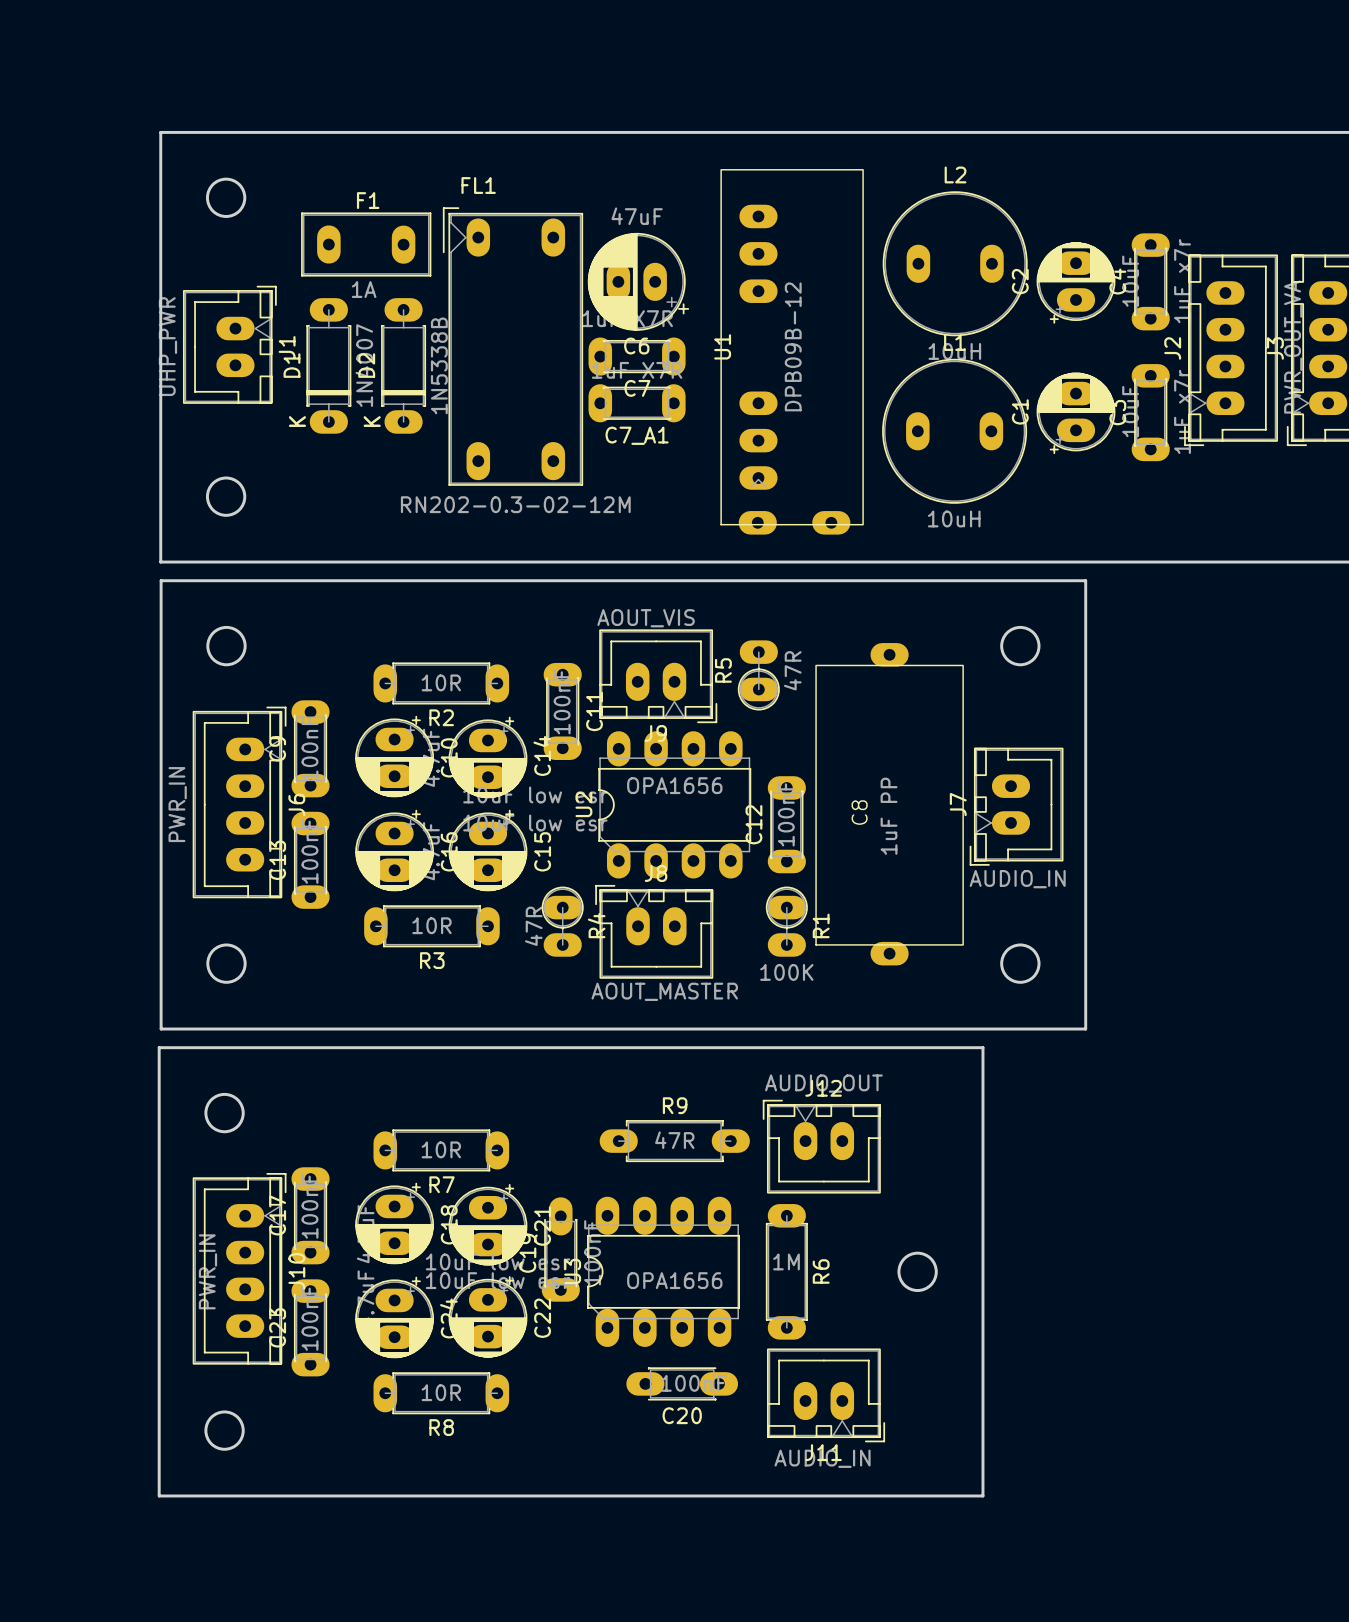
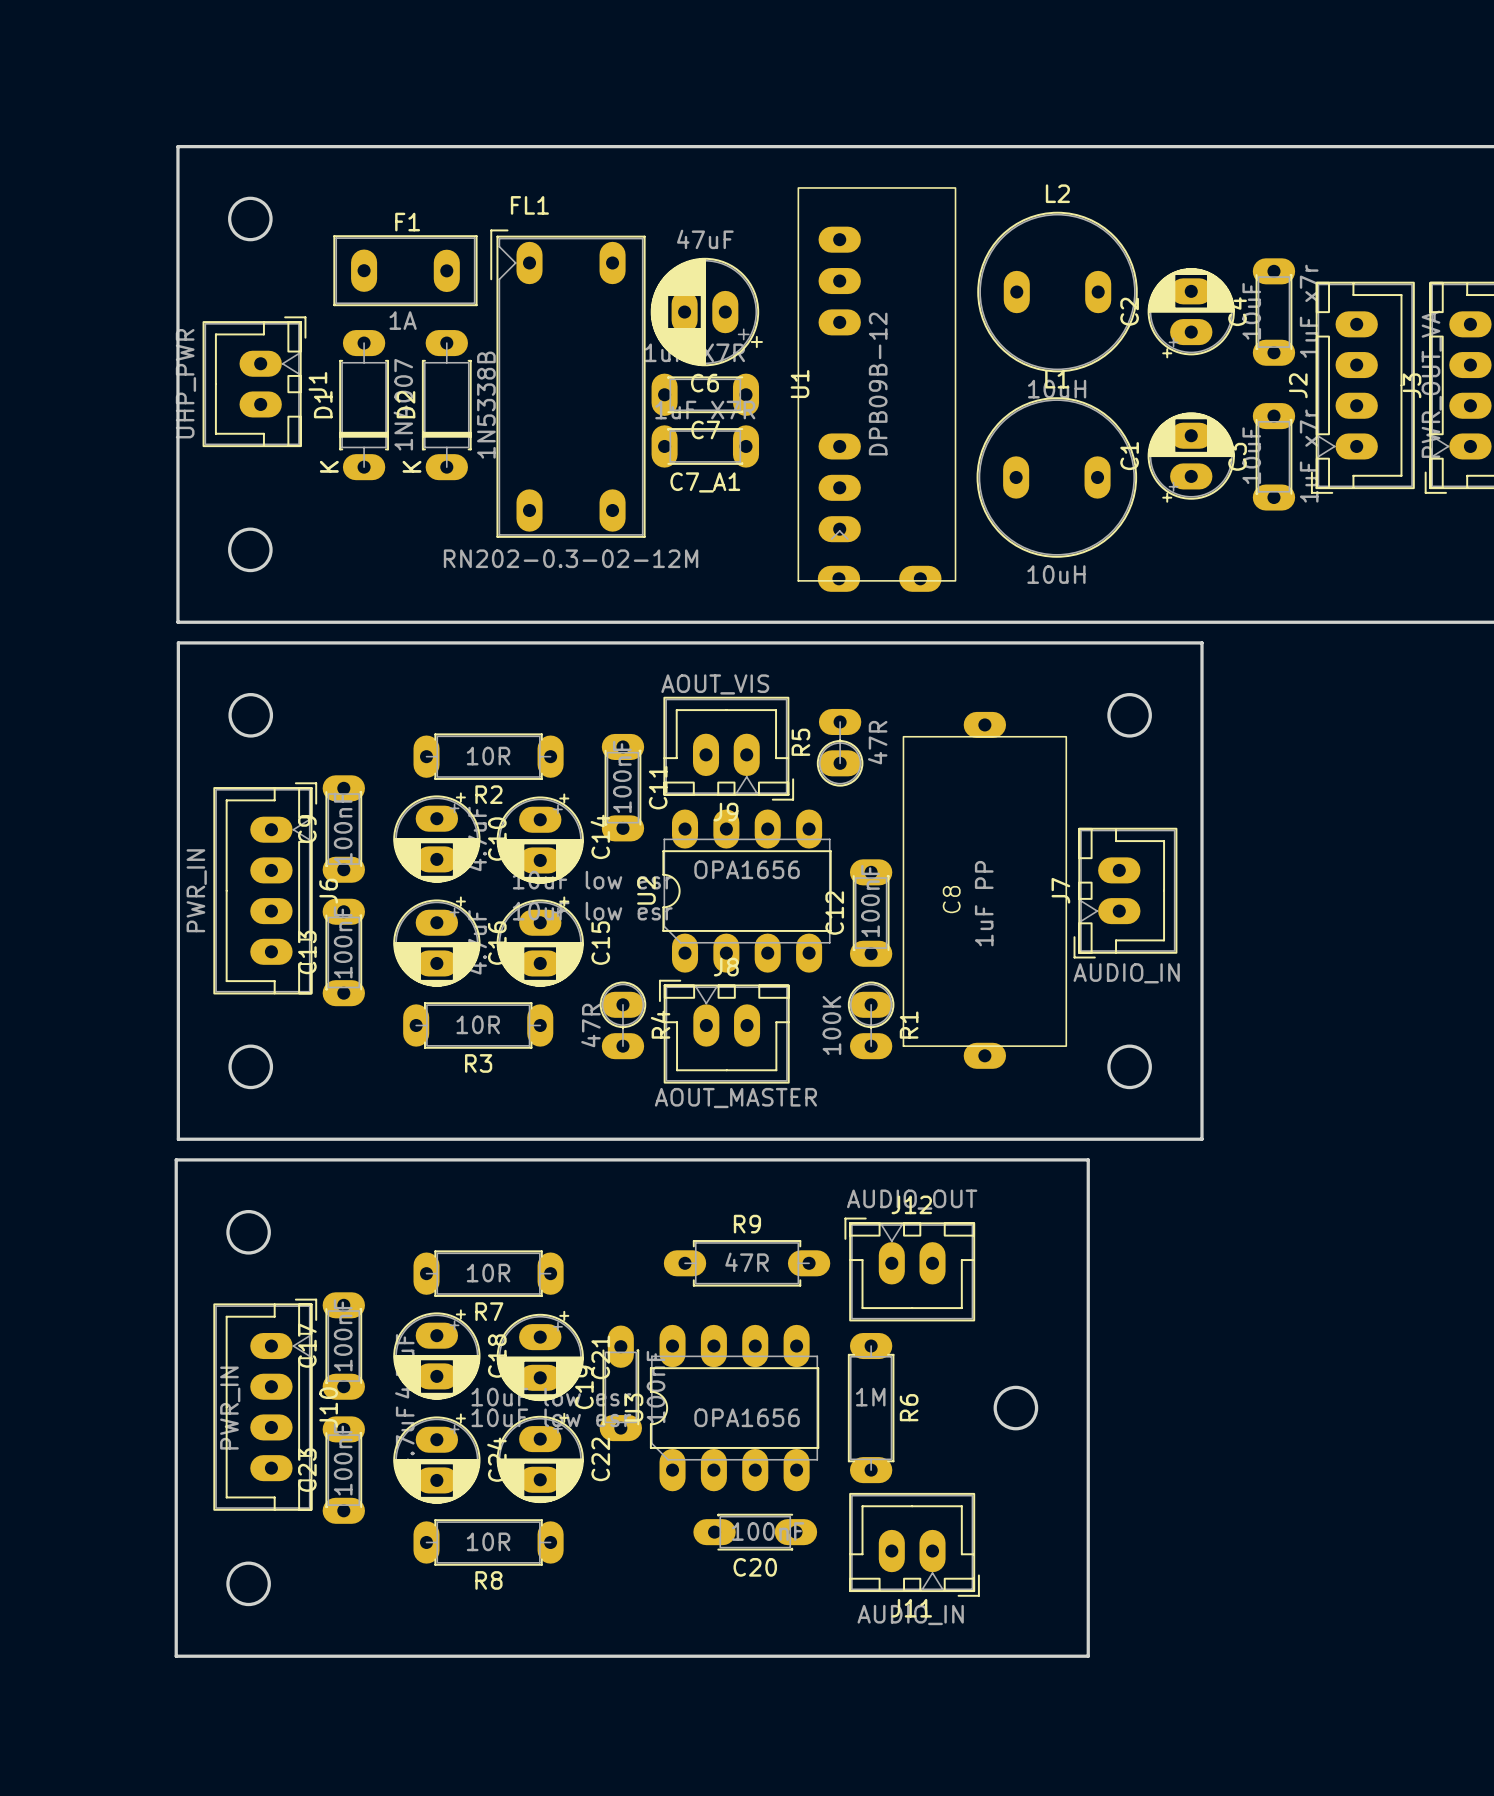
R1 value rotation: 0° (786, 972) -> 90° counterclockwise (831, 1025)

